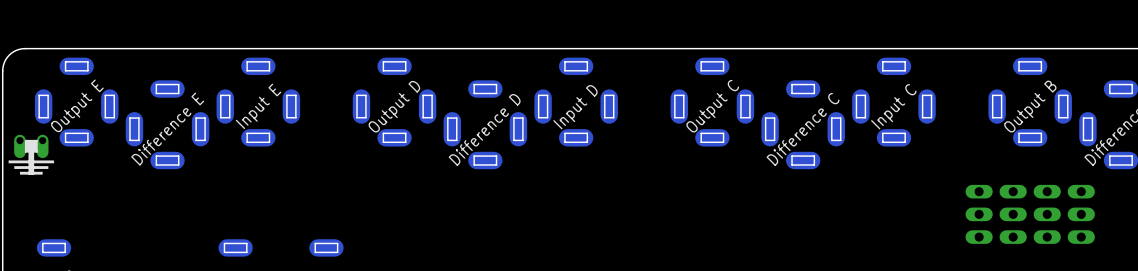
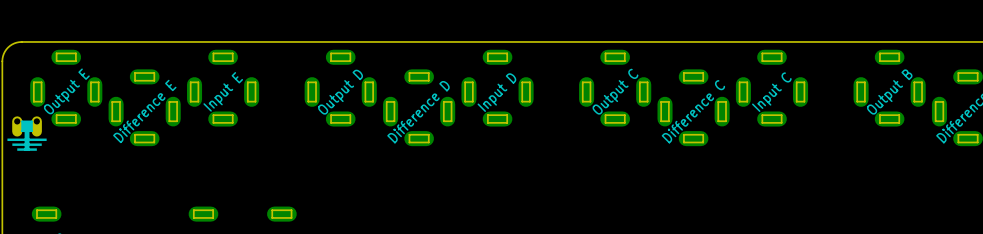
part: (979, 214) -> none
part: (1013, 214) -> none
part: (1047, 214) -> none
part: (1081, 214) -> none

